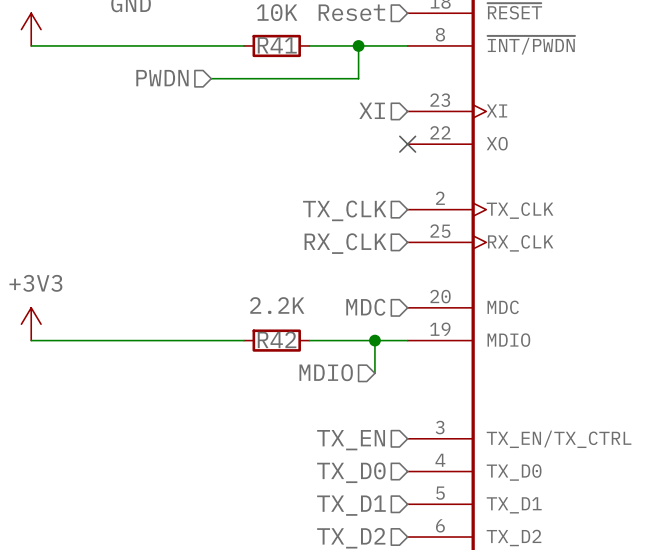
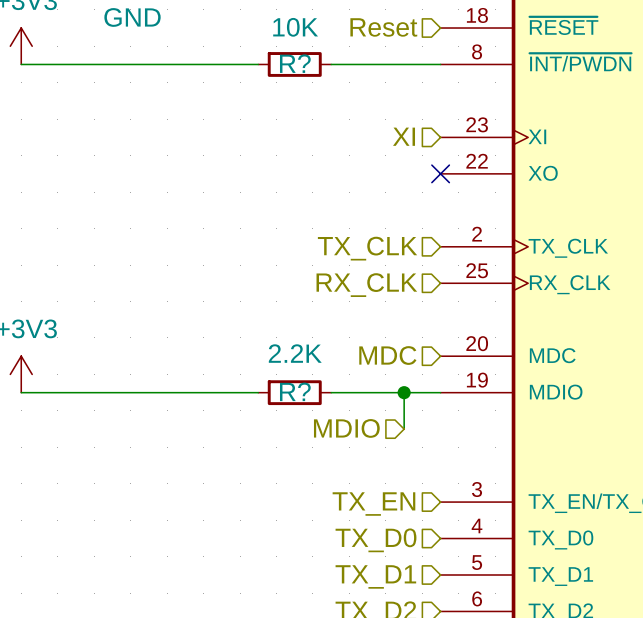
R41 name: R41 (277, 45) -> R? (295, 63)
wire: (358, 45) (358, 78) (211, 78) -> none
junction: (358, 45) -> none
hierarchical label: PWDN (162, 78) -> none
R42 name: R42 (277, 339) -> R? (295, 391)

